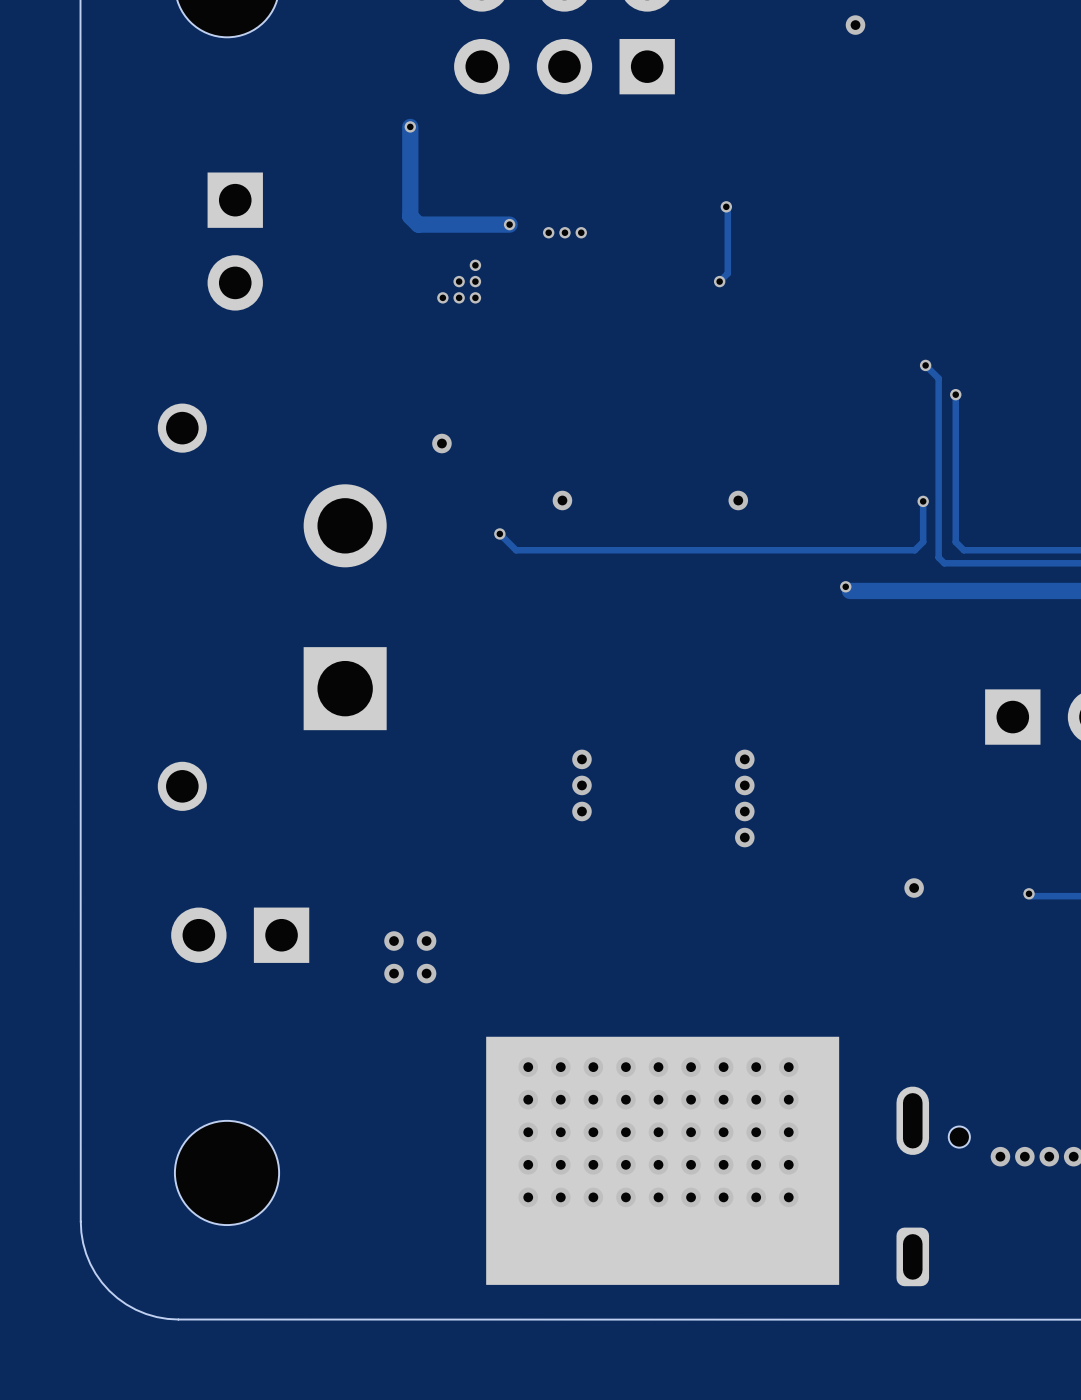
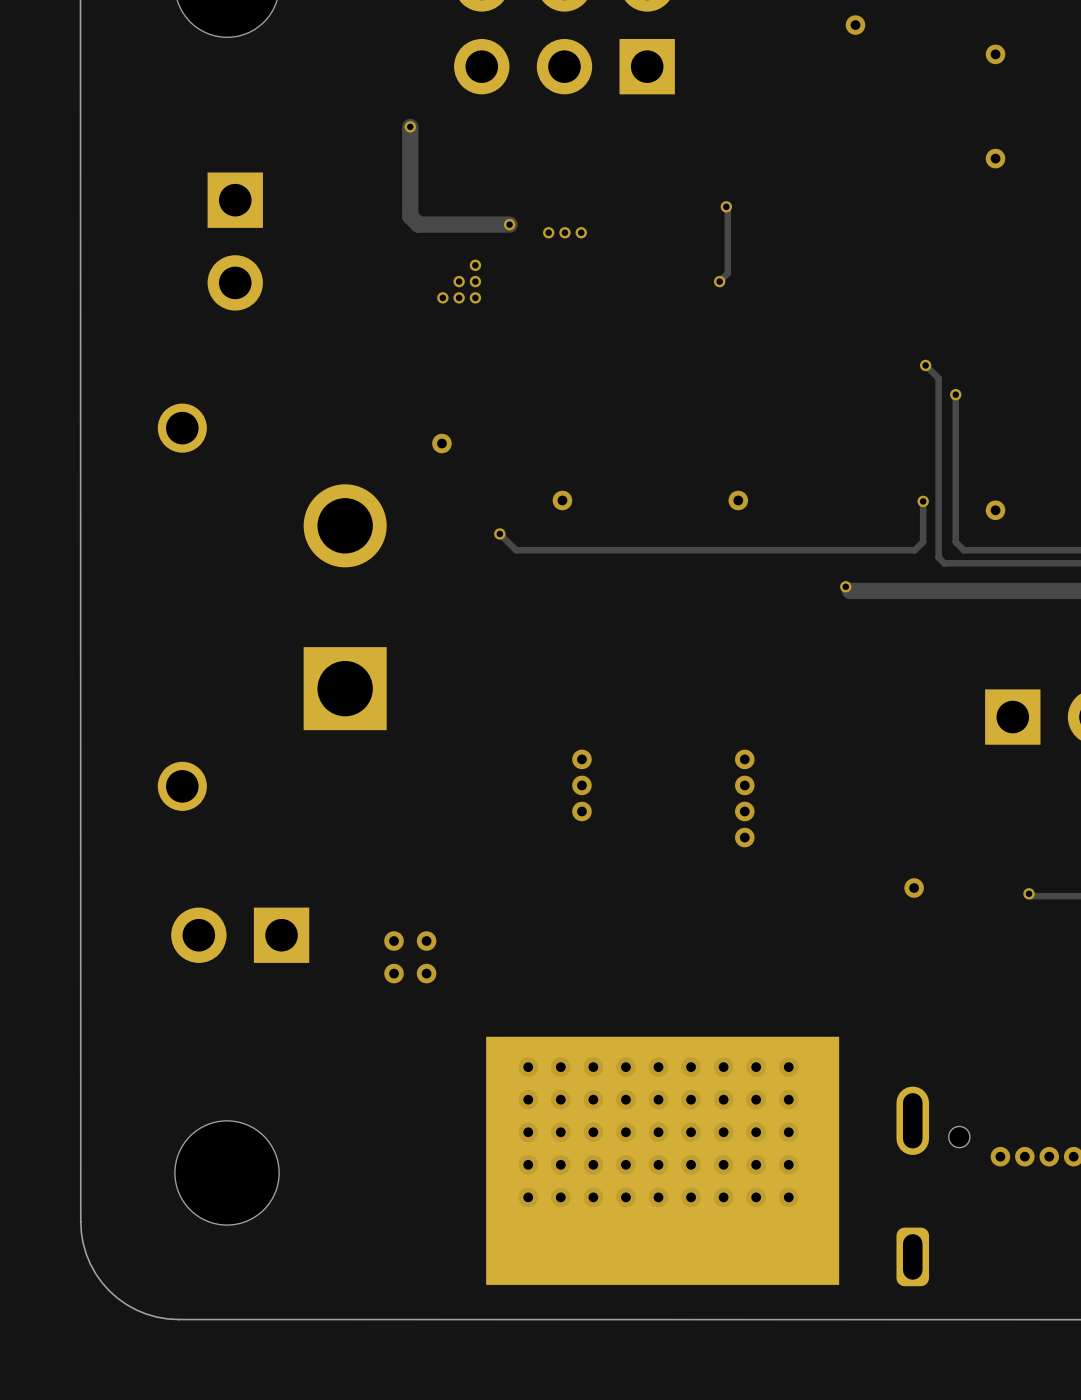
via: none -> (995, 54)
via: none -> (995, 158)
via: none -> (995, 510)

